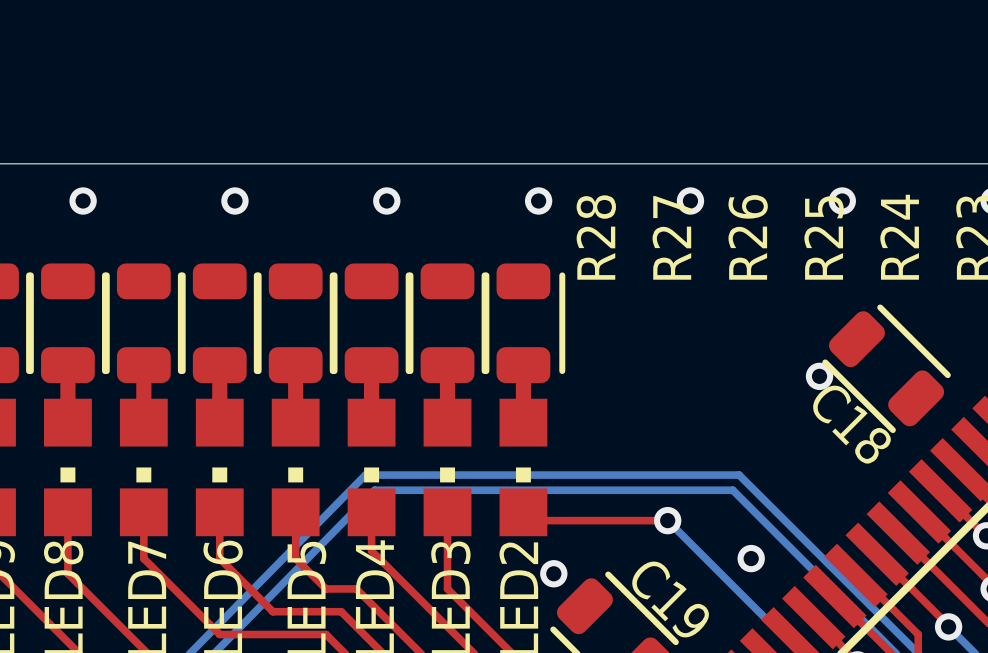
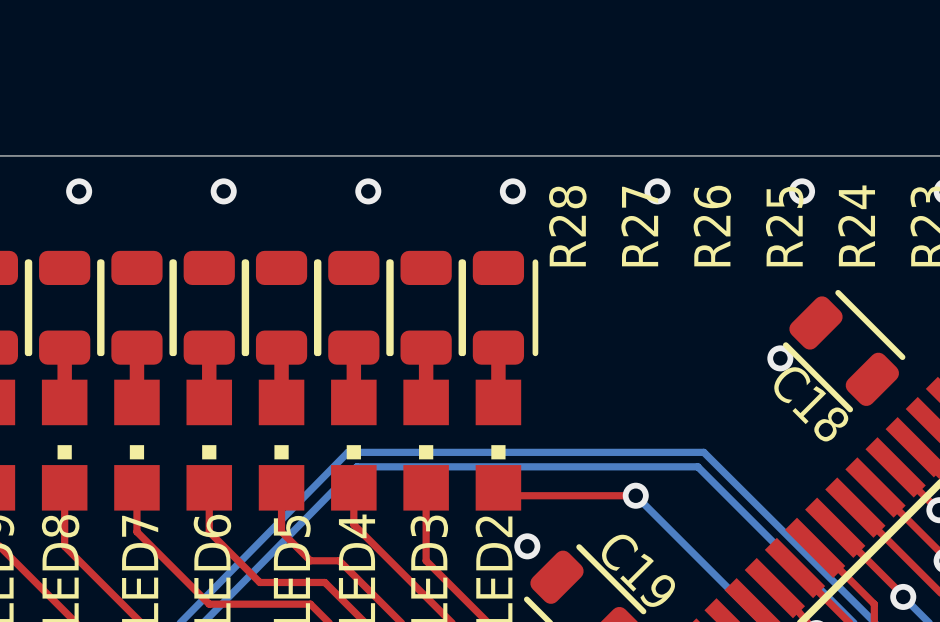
via: (751, 558) -> none

